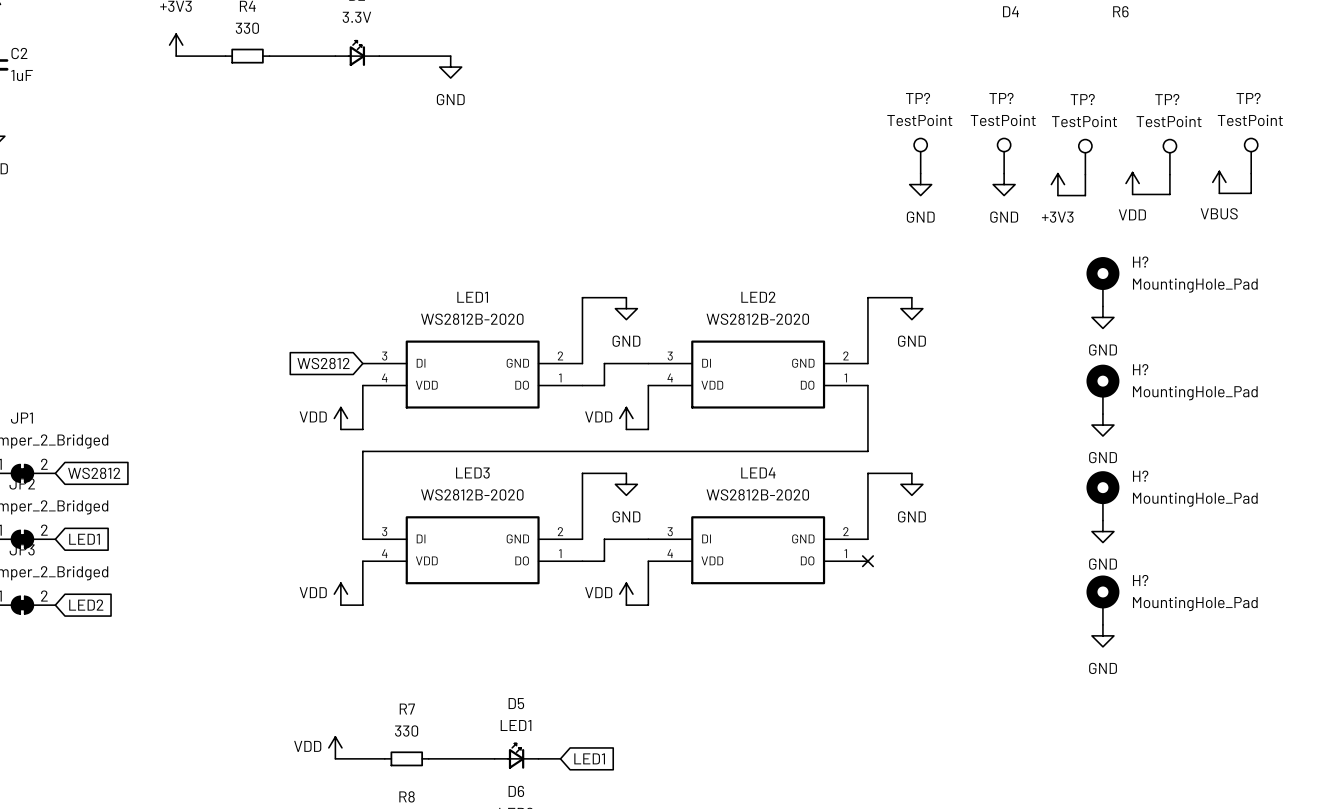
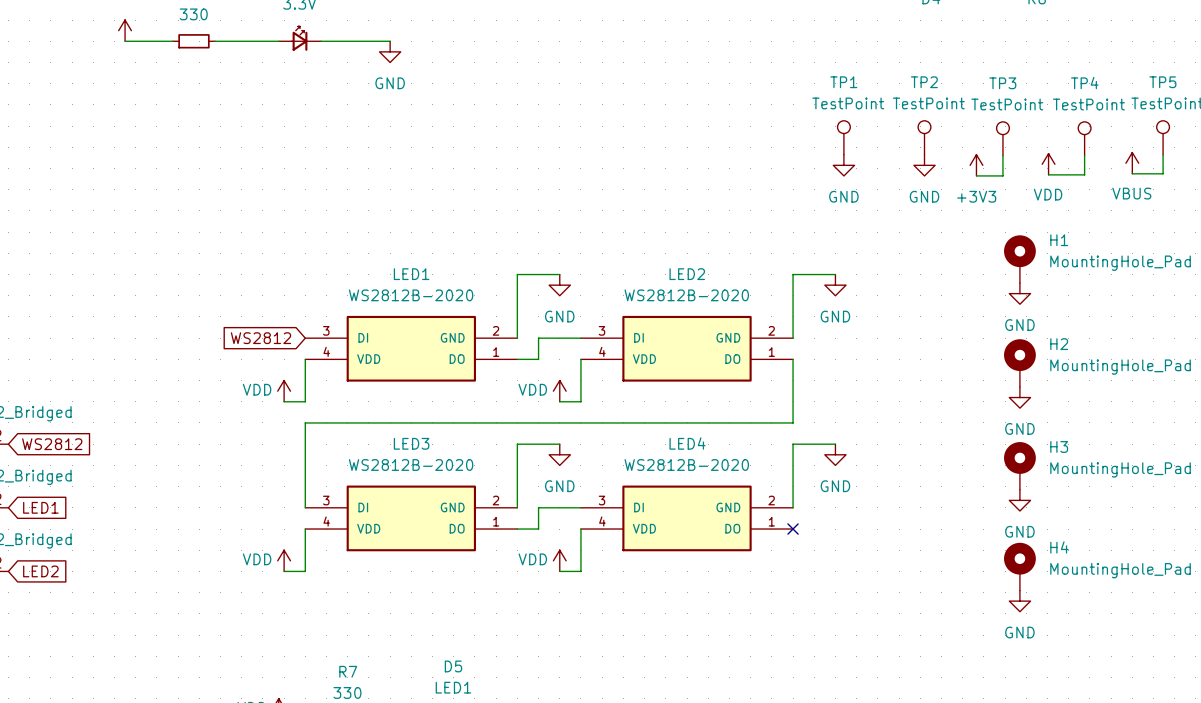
TP? name: TP? (918, 98) -> TP1 (843, 82)
TP? name: TP? (1001, 98) -> TP2 (924, 82)
TP? name: TP? (1248, 98) -> TP5 (1162, 82)
TP? name: TP? (1082, 99) -> TP3 (1002, 83)
TP? name: TP? (1167, 99) -> TP4 (1084, 83)
H? name: H? (1140, 262) -> H1 (1059, 240)
H? name: H? (1140, 369) -> H2 (1059, 344)
H? name: H? (1140, 476) -> H3 (1059, 446)
H? name: H? (1140, 580) -> H4 (1059, 547)

